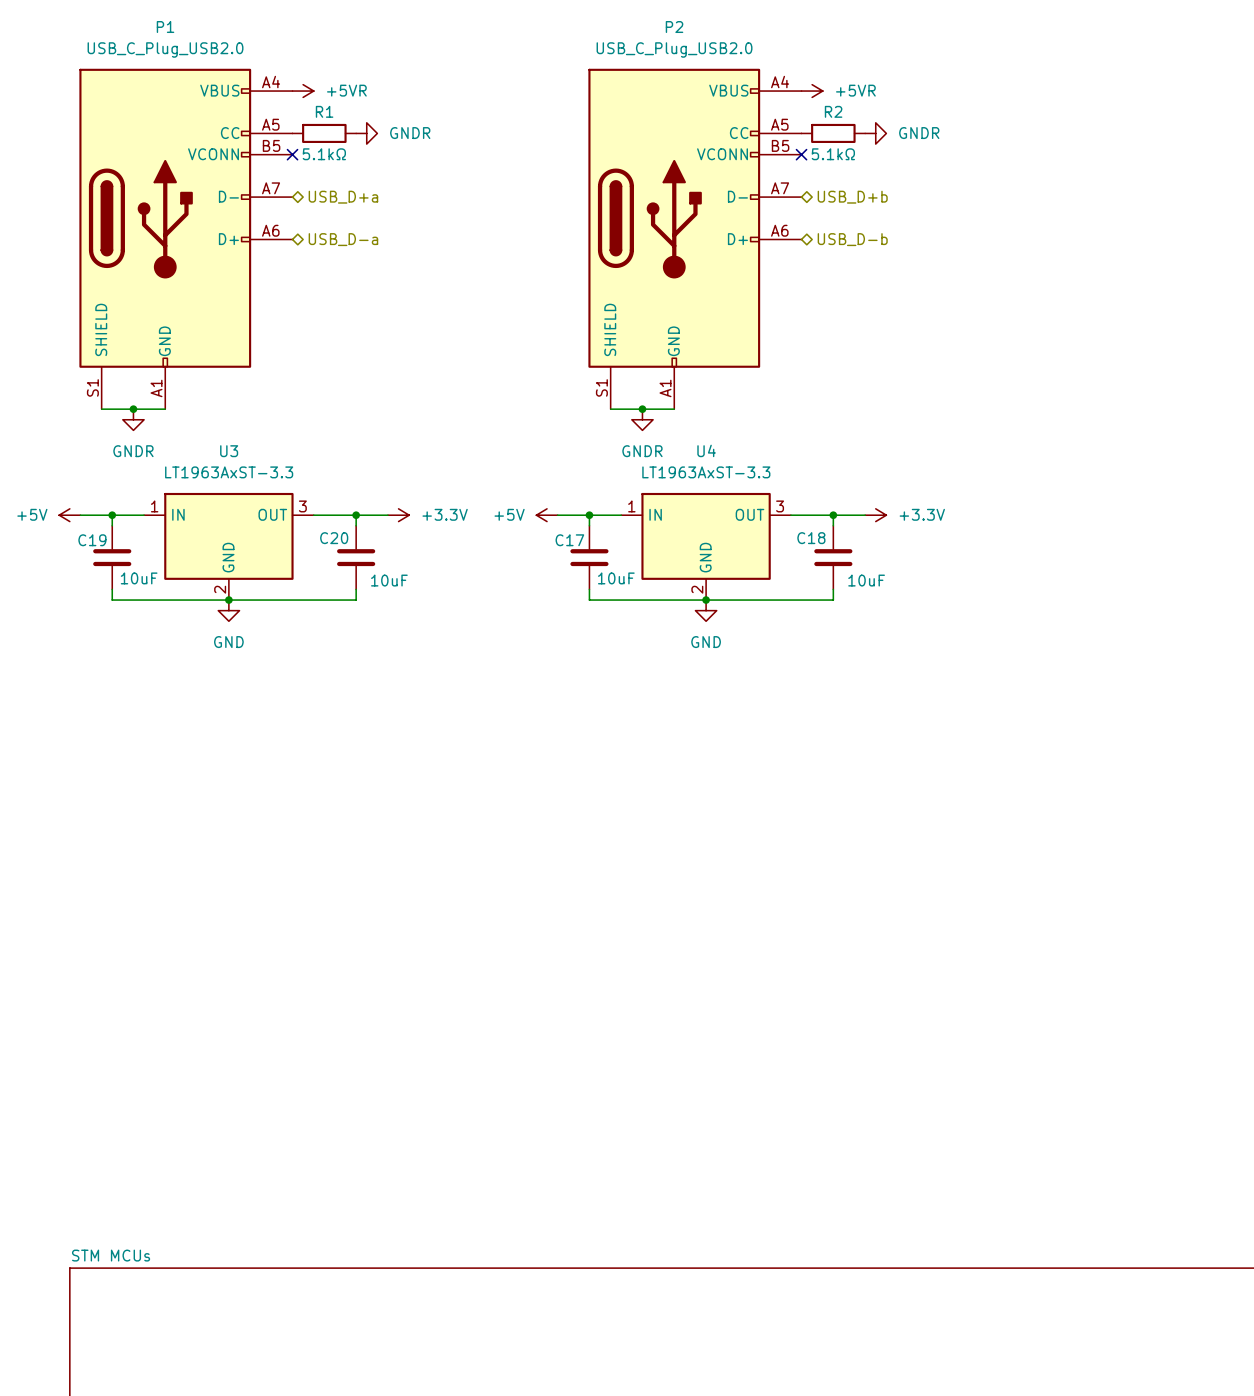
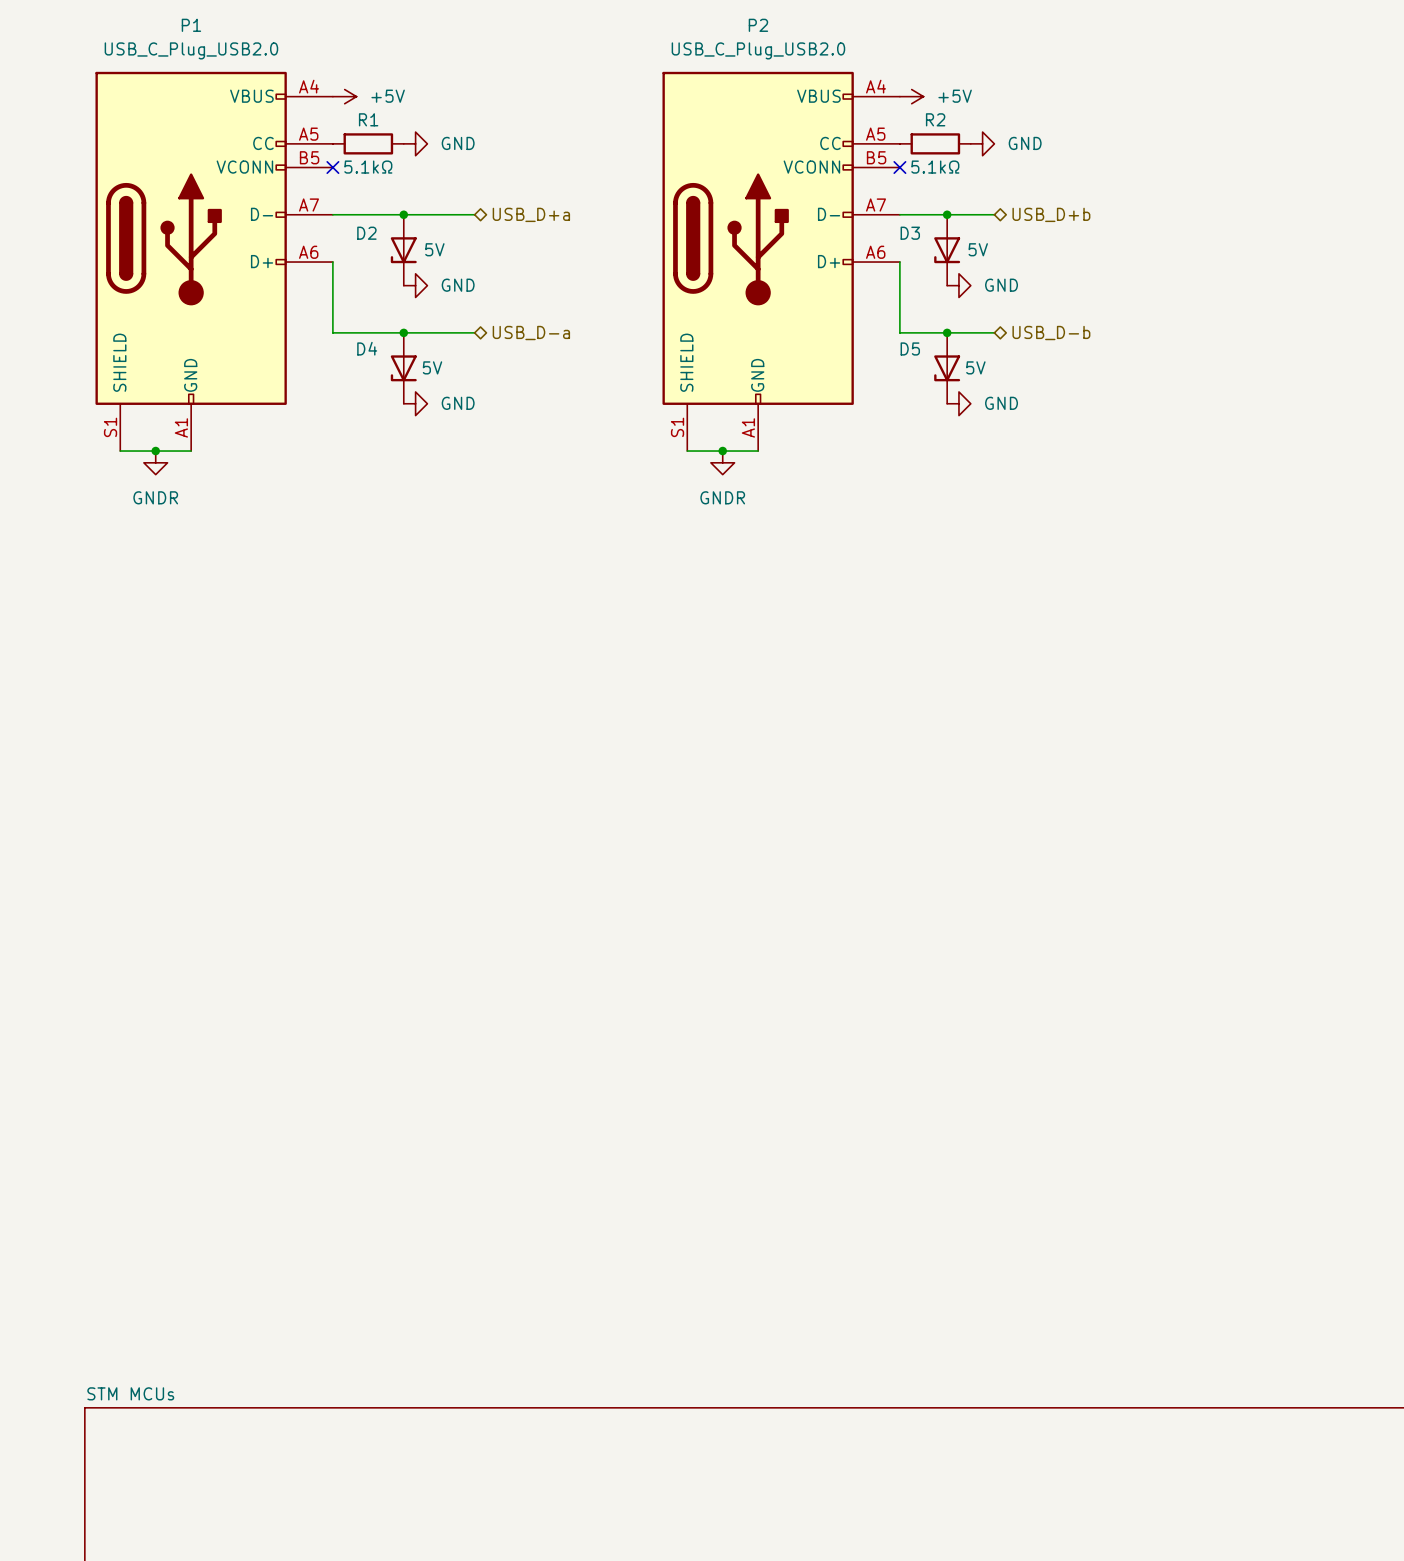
power symbol: +5VR (303, 91) -> +5V (344, 96)
power symbol: +5VR (812, 91) -> +5V (911, 96)
power symbol: GNDR (366, 133) -> GND (415, 143)
power symbol: GNDR (875, 133) -> GND (982, 143)
wire: none -> (332, 214) (474, 214)
hierarchical label position: USB_D+a (343, 197) -> USB_D+a (531, 214)
junction: none -> (403, 214)
wire: none -> (899, 214) (994, 214)
junction: none -> (947, 214)
hierarchical label position: USB_D+b (852, 197) -> USB_D+b (1051, 214)
D2: none -> 5V (403, 250)
D3: none -> 5V (947, 250)
wire: none -> (332, 262) (332, 332) (474, 332)
hierarchical label position: USB_D-a (343, 239) -> USB_D-a (531, 333)
wire: none -> (899, 262) (899, 332) (994, 332)
hierarchical label position: USB_D-b (852, 239) -> USB_D-b (1051, 333)
power symbol: none -> GND (415, 285)
power symbol: none -> GND (958, 285)
junction: none -> (403, 332)
junction: none -> (947, 332)
D4: none -> 5V (403, 368)
D5: none -> 5V (947, 368)
power symbol: none -> GND (415, 403)
power symbol: none -> GND (958, 403)
power symbol: +5V (69, 515) -> none
wire: (80, 515) (144, 515) -> none
wire: (112, 515) (112, 525) -> none
junction: (112, 515) -> none
wire: (313, 515) (387, 515) -> none
wire: (356, 515) (356, 525) -> none
junction: (356, 515) -> none
power symbol: +3.3V (398, 515) -> none
power symbol: +5V (547, 515) -> none
wire: (557, 515) (621, 515) -> none
wire: (589, 515) (589, 525) -> none
junction: (589, 515) -> none
wire: (790, 515) (865, 515) -> none
wire: (833, 515) (833, 525) -> none
junction: (833, 515) -> none
power symbol: +3.3V (875, 515) -> none
U3: LT1963AxST-3.3 (228, 546) -> none
U4: LT1963AxST-3.3 (706, 546) -> none
C19: 10uF (112, 557) -> none
C20: 10uF (356, 557) -> none
C17: 10uF (589, 557) -> none
C18: 10uF (833, 557) -> none
wire: (112, 589) (112, 600) (356, 600) (356, 589) -> none
wire: (589, 589) (589, 600) (833, 600) (833, 589) -> none
junction: (228, 600) -> none
junction: (706, 600) -> none
power symbol: GND (228, 610) -> none
power symbol: GND (706, 610) -> none

